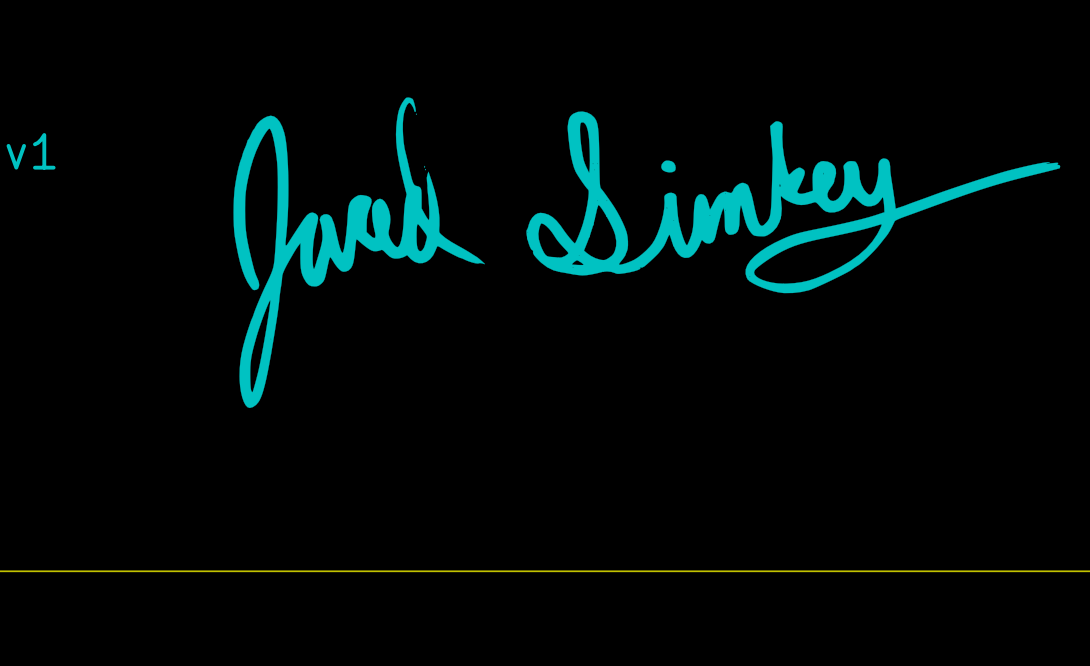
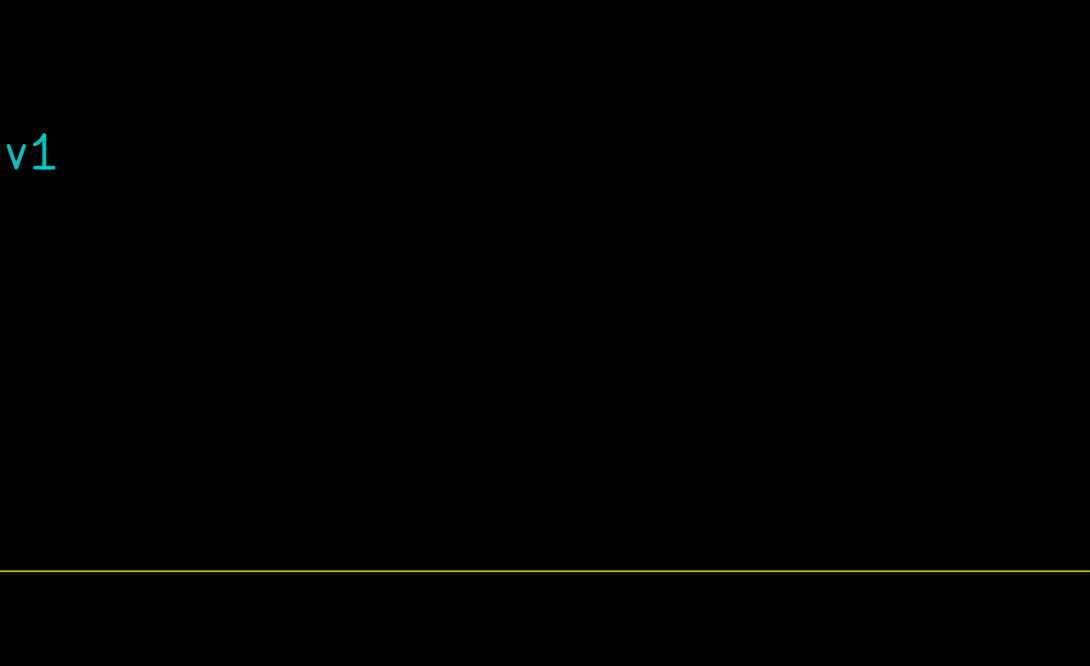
drawing: [233, 97, 1061, 409] -> none

